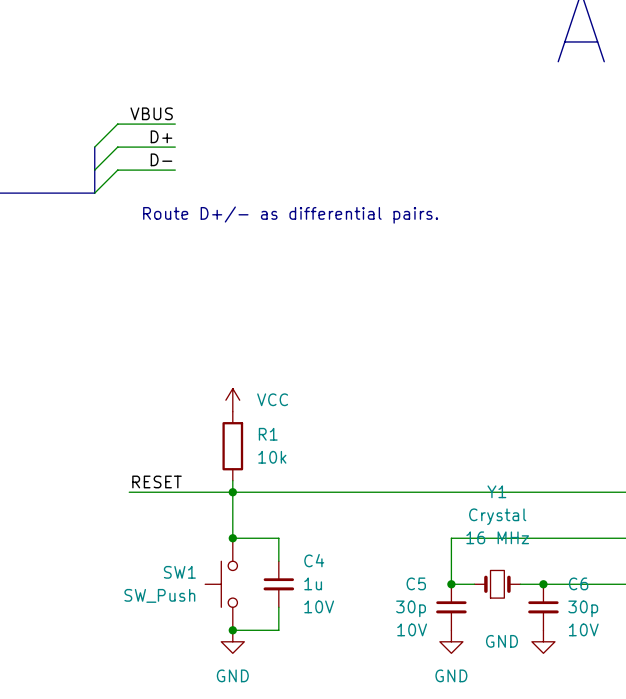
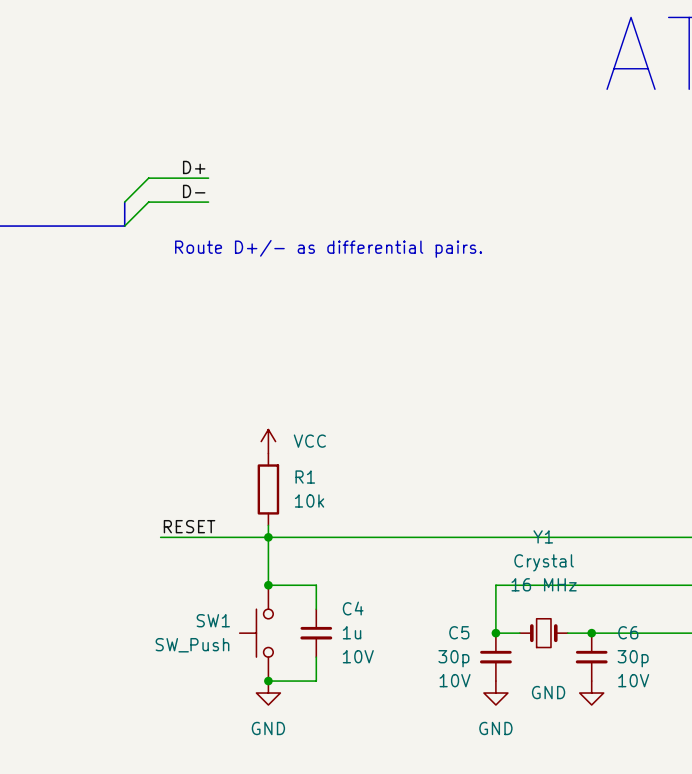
label: VBUS (151, 113) -> none
wire: (175, 124) (117, 124) (94, 147) -> none
bus: (94, 147) (94, 170) -> none

